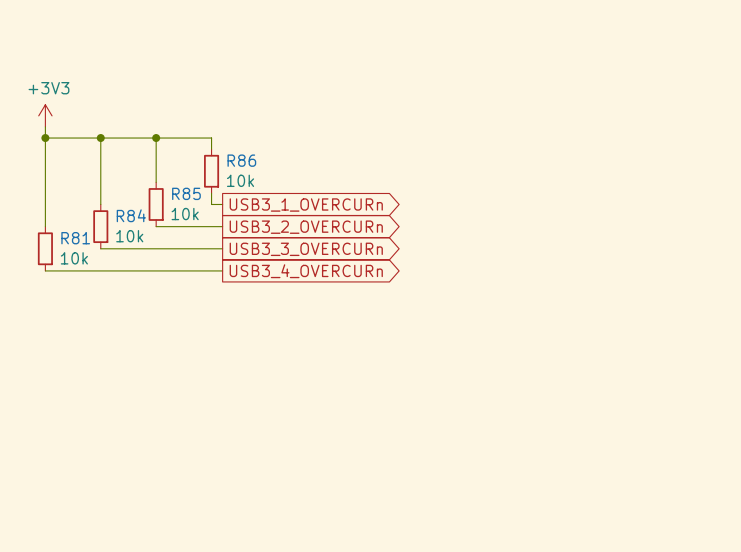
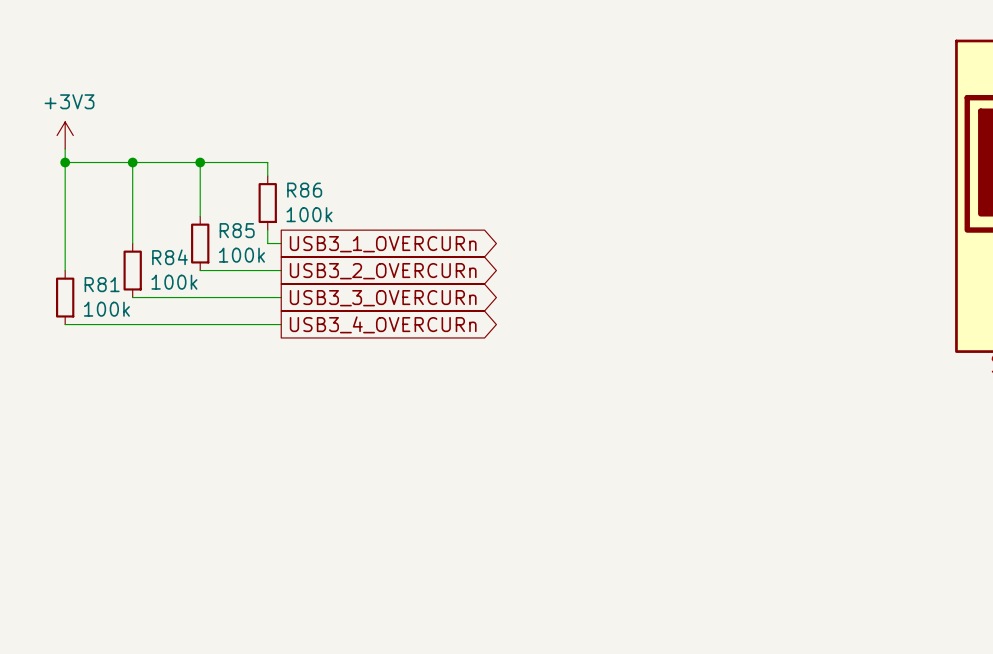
R86 value: 10k (240, 180) -> 100k (309, 214)
R85 value: 10k (185, 214) -> 100k (241, 255)
R84 value: 10k (129, 236) -> 100k (174, 282)
R81 value: 10k (74, 258) -> 100k (106, 309)

